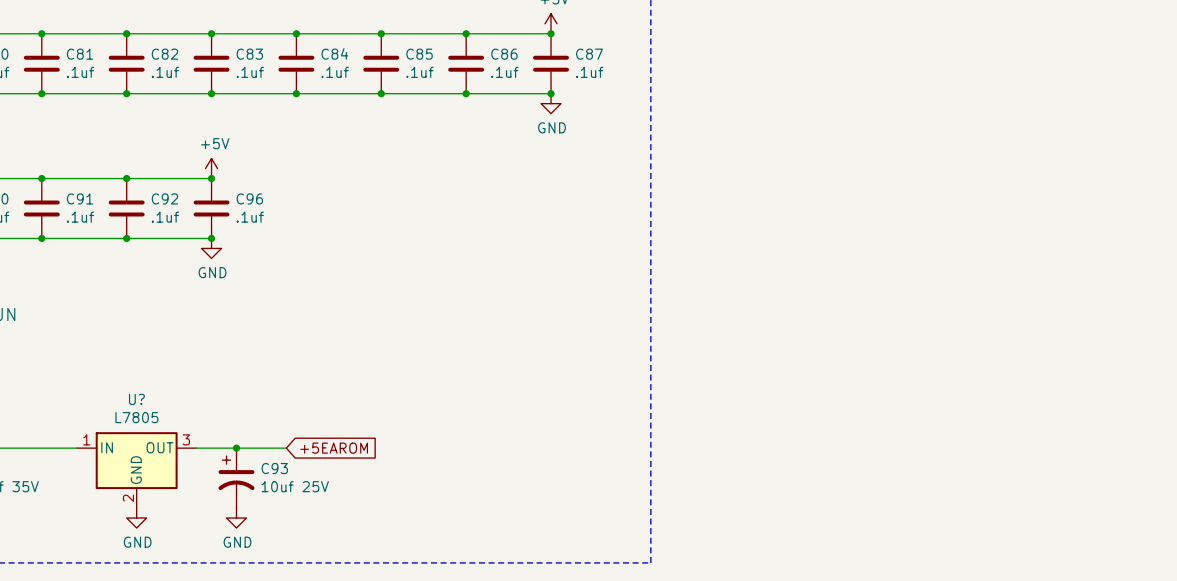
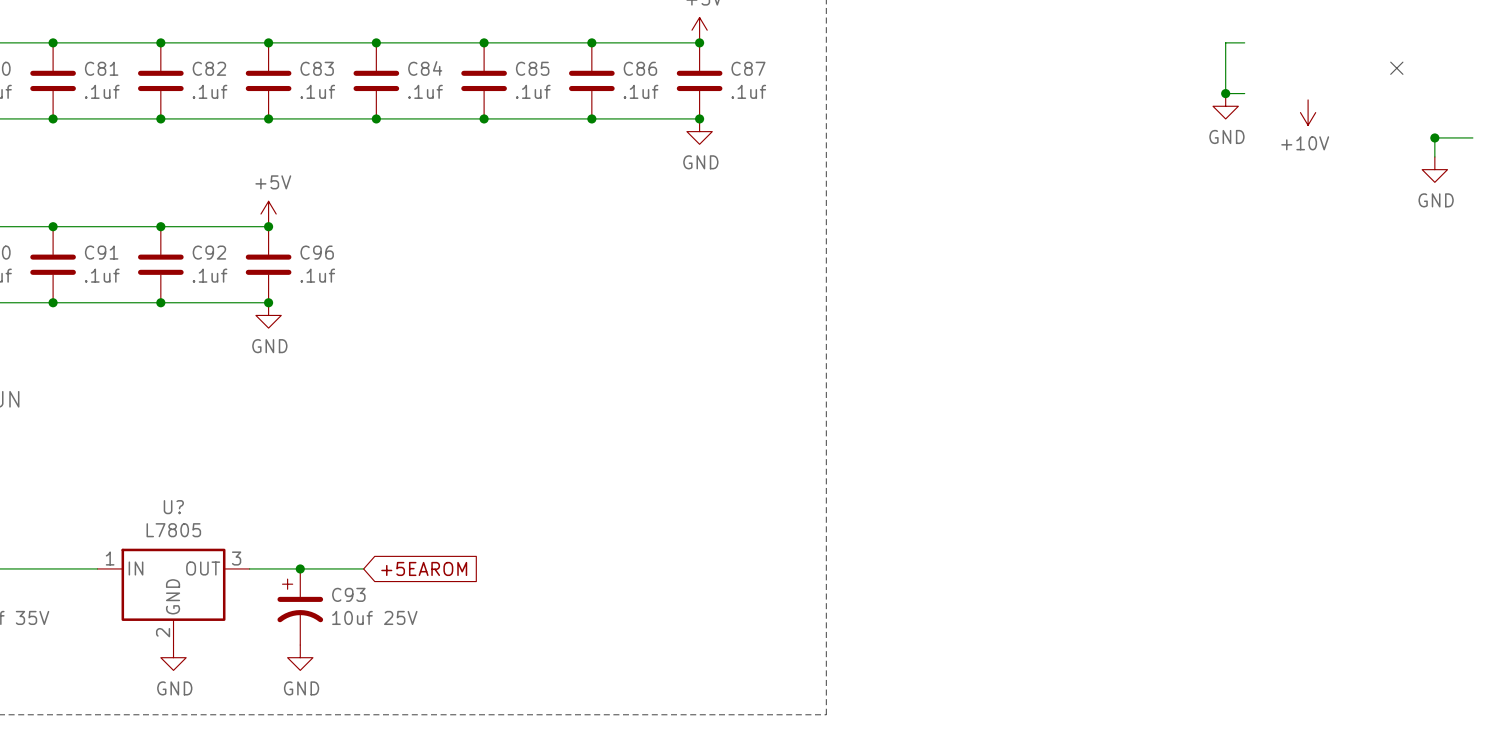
wire: none -> (1244, 42) (1225, 42) (1225, 93) (1244, 93)
no-connect mark: none -> (1396, 68)
junction: none -> (1225, 93)
power symbol: none -> GND (1225, 106)
power symbol: none -> +10V (1308, 112)
junction: none -> (1434, 137)
wire: none -> (1472, 137) (1434, 137) (1434, 156)
power symbol: none -> GND (1434, 169)

